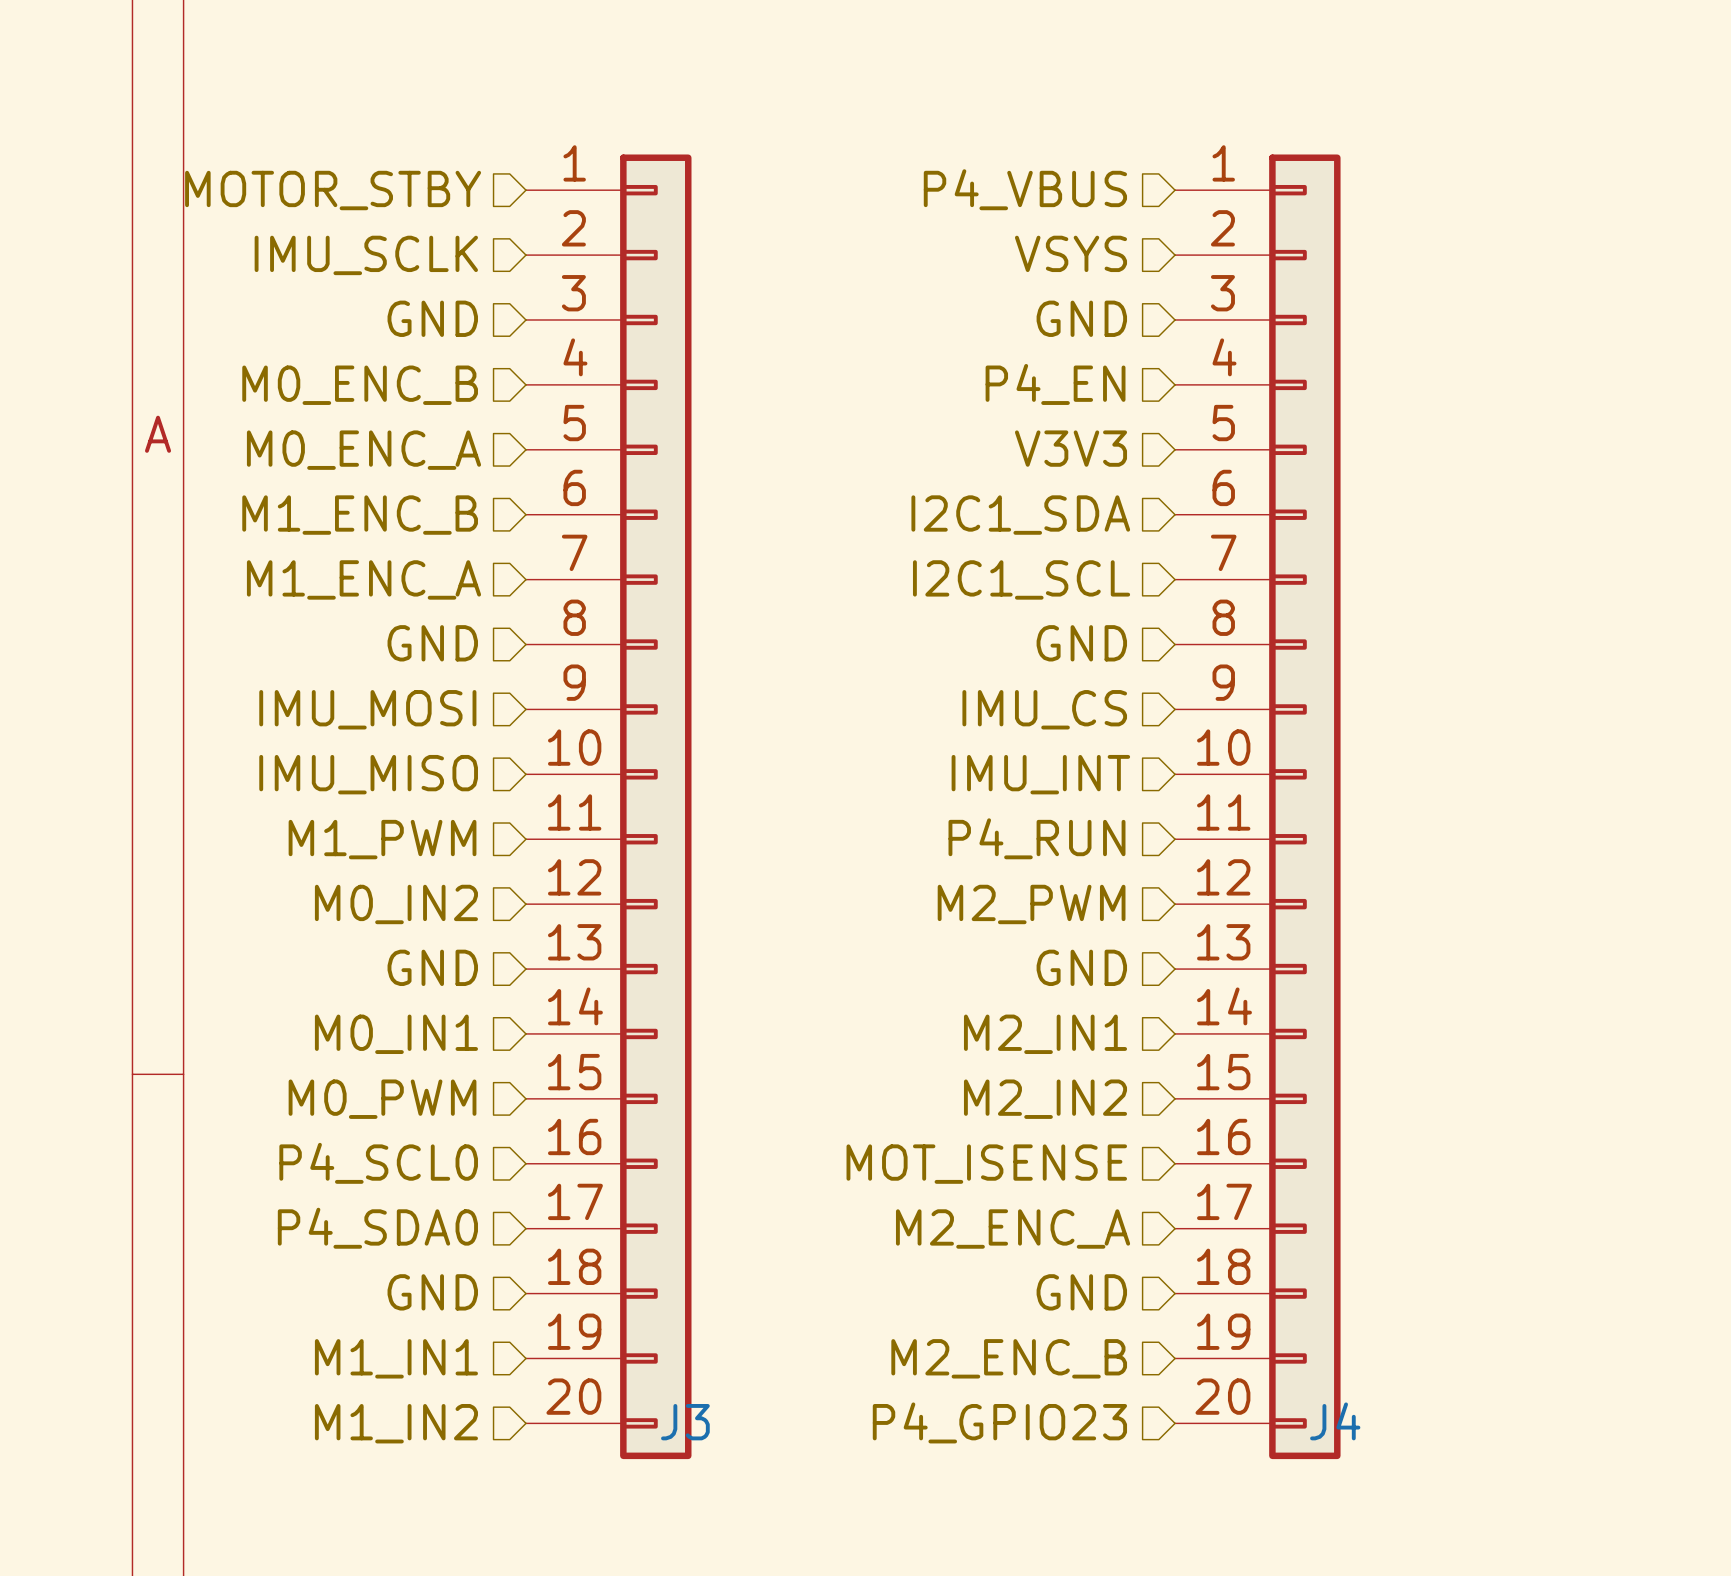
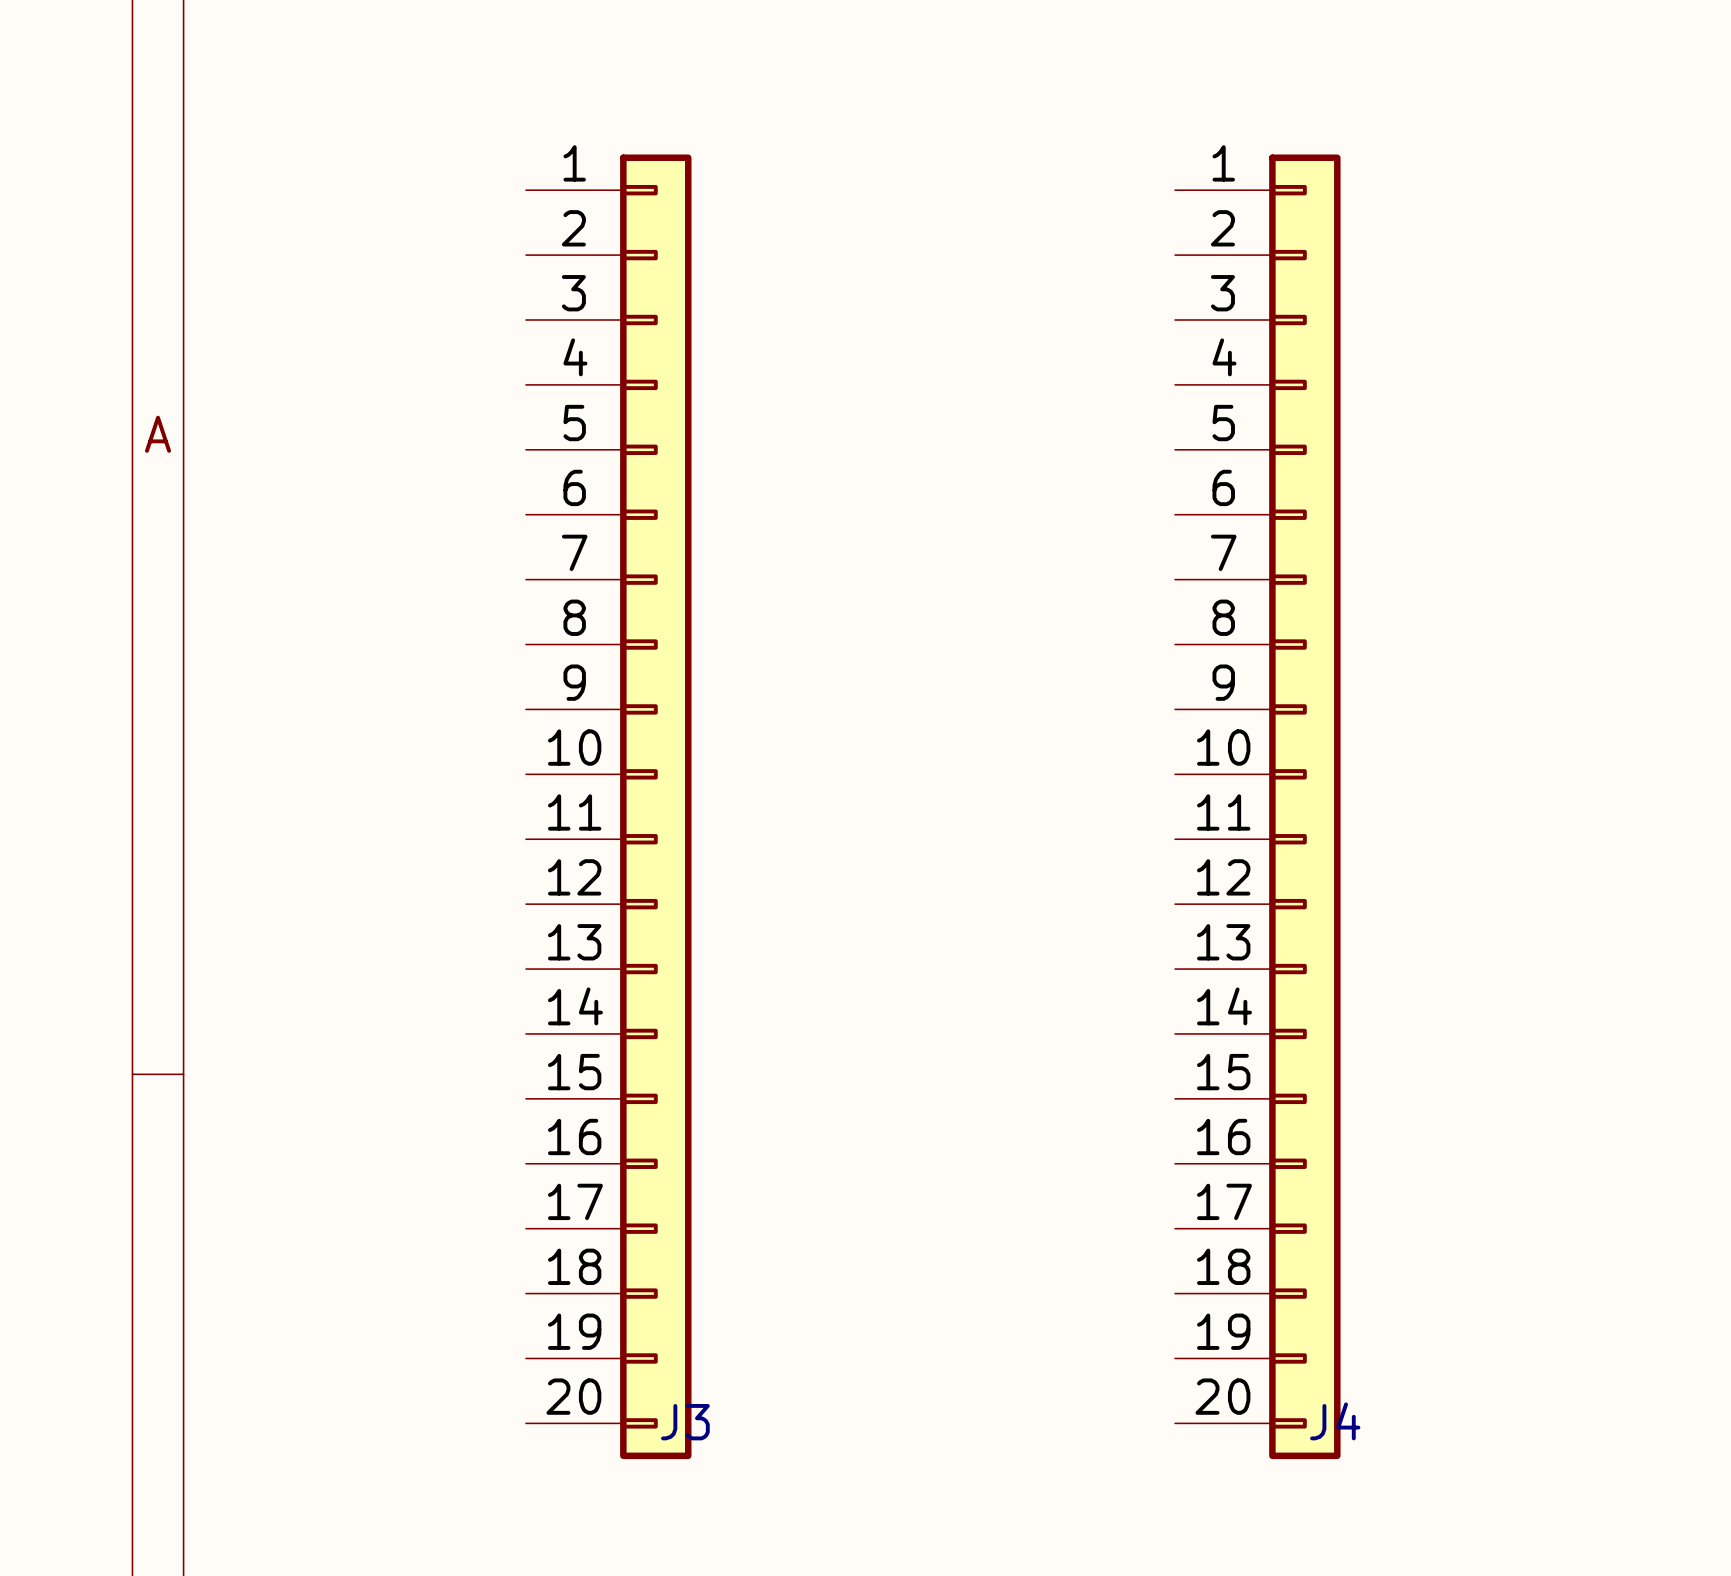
hierarchical label: P4_VBUS (1025, 189) -> none
hierarchical label: MOTOR_STBY (333, 190) -> none
hierarchical label: VSYS (1070, 253) -> none
hierarchical label: IMU_SCLK (366, 255) -> none
hierarchical label: GND (432, 318) -> none
hierarchical label: GND (1081, 318) -> none
hierarchical label: P4_EN (1055, 384) -> none
hierarchical label: M0_ENC_B (360, 385) -> none
hierarchical label: V3V3 (1070, 448) -> none
hierarchical label: M0_ENC_A (363, 450) -> none
hierarchical label: M1_ENC_B (360, 515) -> none
hierarchical label: I2C1_SDA (1020, 515) -> none
hierarchical label: M1_ENC_A (363, 579) -> none
hierarchical label: I2C1_SCL (1021, 579) -> none
hierarchical label: GND (432, 643) -> none
hierarchical label: GND (1081, 643) -> none
hierarchical label: IMU_MOSI (367, 709) -> none
hierarchical label: IMU_CS (1044, 709) -> none
hierarchical label: IMU_MISO (368, 774) -> none
hierarchical label: IMU_INT (1040, 774) -> none
hierarchical label: P4_RUN (1037, 838) -> none
hierarchical label: M1_PWM (382, 839) -> none
hierarchical label: M0_IN2 (396, 904) -> none
hierarchical label: M2_PWM (1031, 904) -> none
hierarchical label: GND (432, 967) -> none
hierarchical label: GND (1081, 967) -> none
hierarchical label: M0_IN1 (396, 1034) -> none
hierarchical label: M2_IN1 (1045, 1034) -> none
hierarchical label: M0_PWM (382, 1099) -> none
hierarchical label: M2_IN2 (1045, 1099) -> none
hierarchical label: P4_SCL0 (378, 1163) -> none
hierarchical label: MOT_ISENSE (986, 1164) -> none
hierarchical label: P4_SDA0 (377, 1228) -> none
hierarchical label: M2_ENC_A (1013, 1229) -> none
hierarchical label: GND (432, 1292) -> none
hierarchical label: GND (1081, 1292) -> none
hierarchical label: M1_IN1 (396, 1358) -> none
hierarchical label: M2_ENC_B (1009, 1358) -> none
hierarchical label: P4_GPIO23 (999, 1422) -> none
hierarchical label: M1_IN2 (396, 1423) -> none

